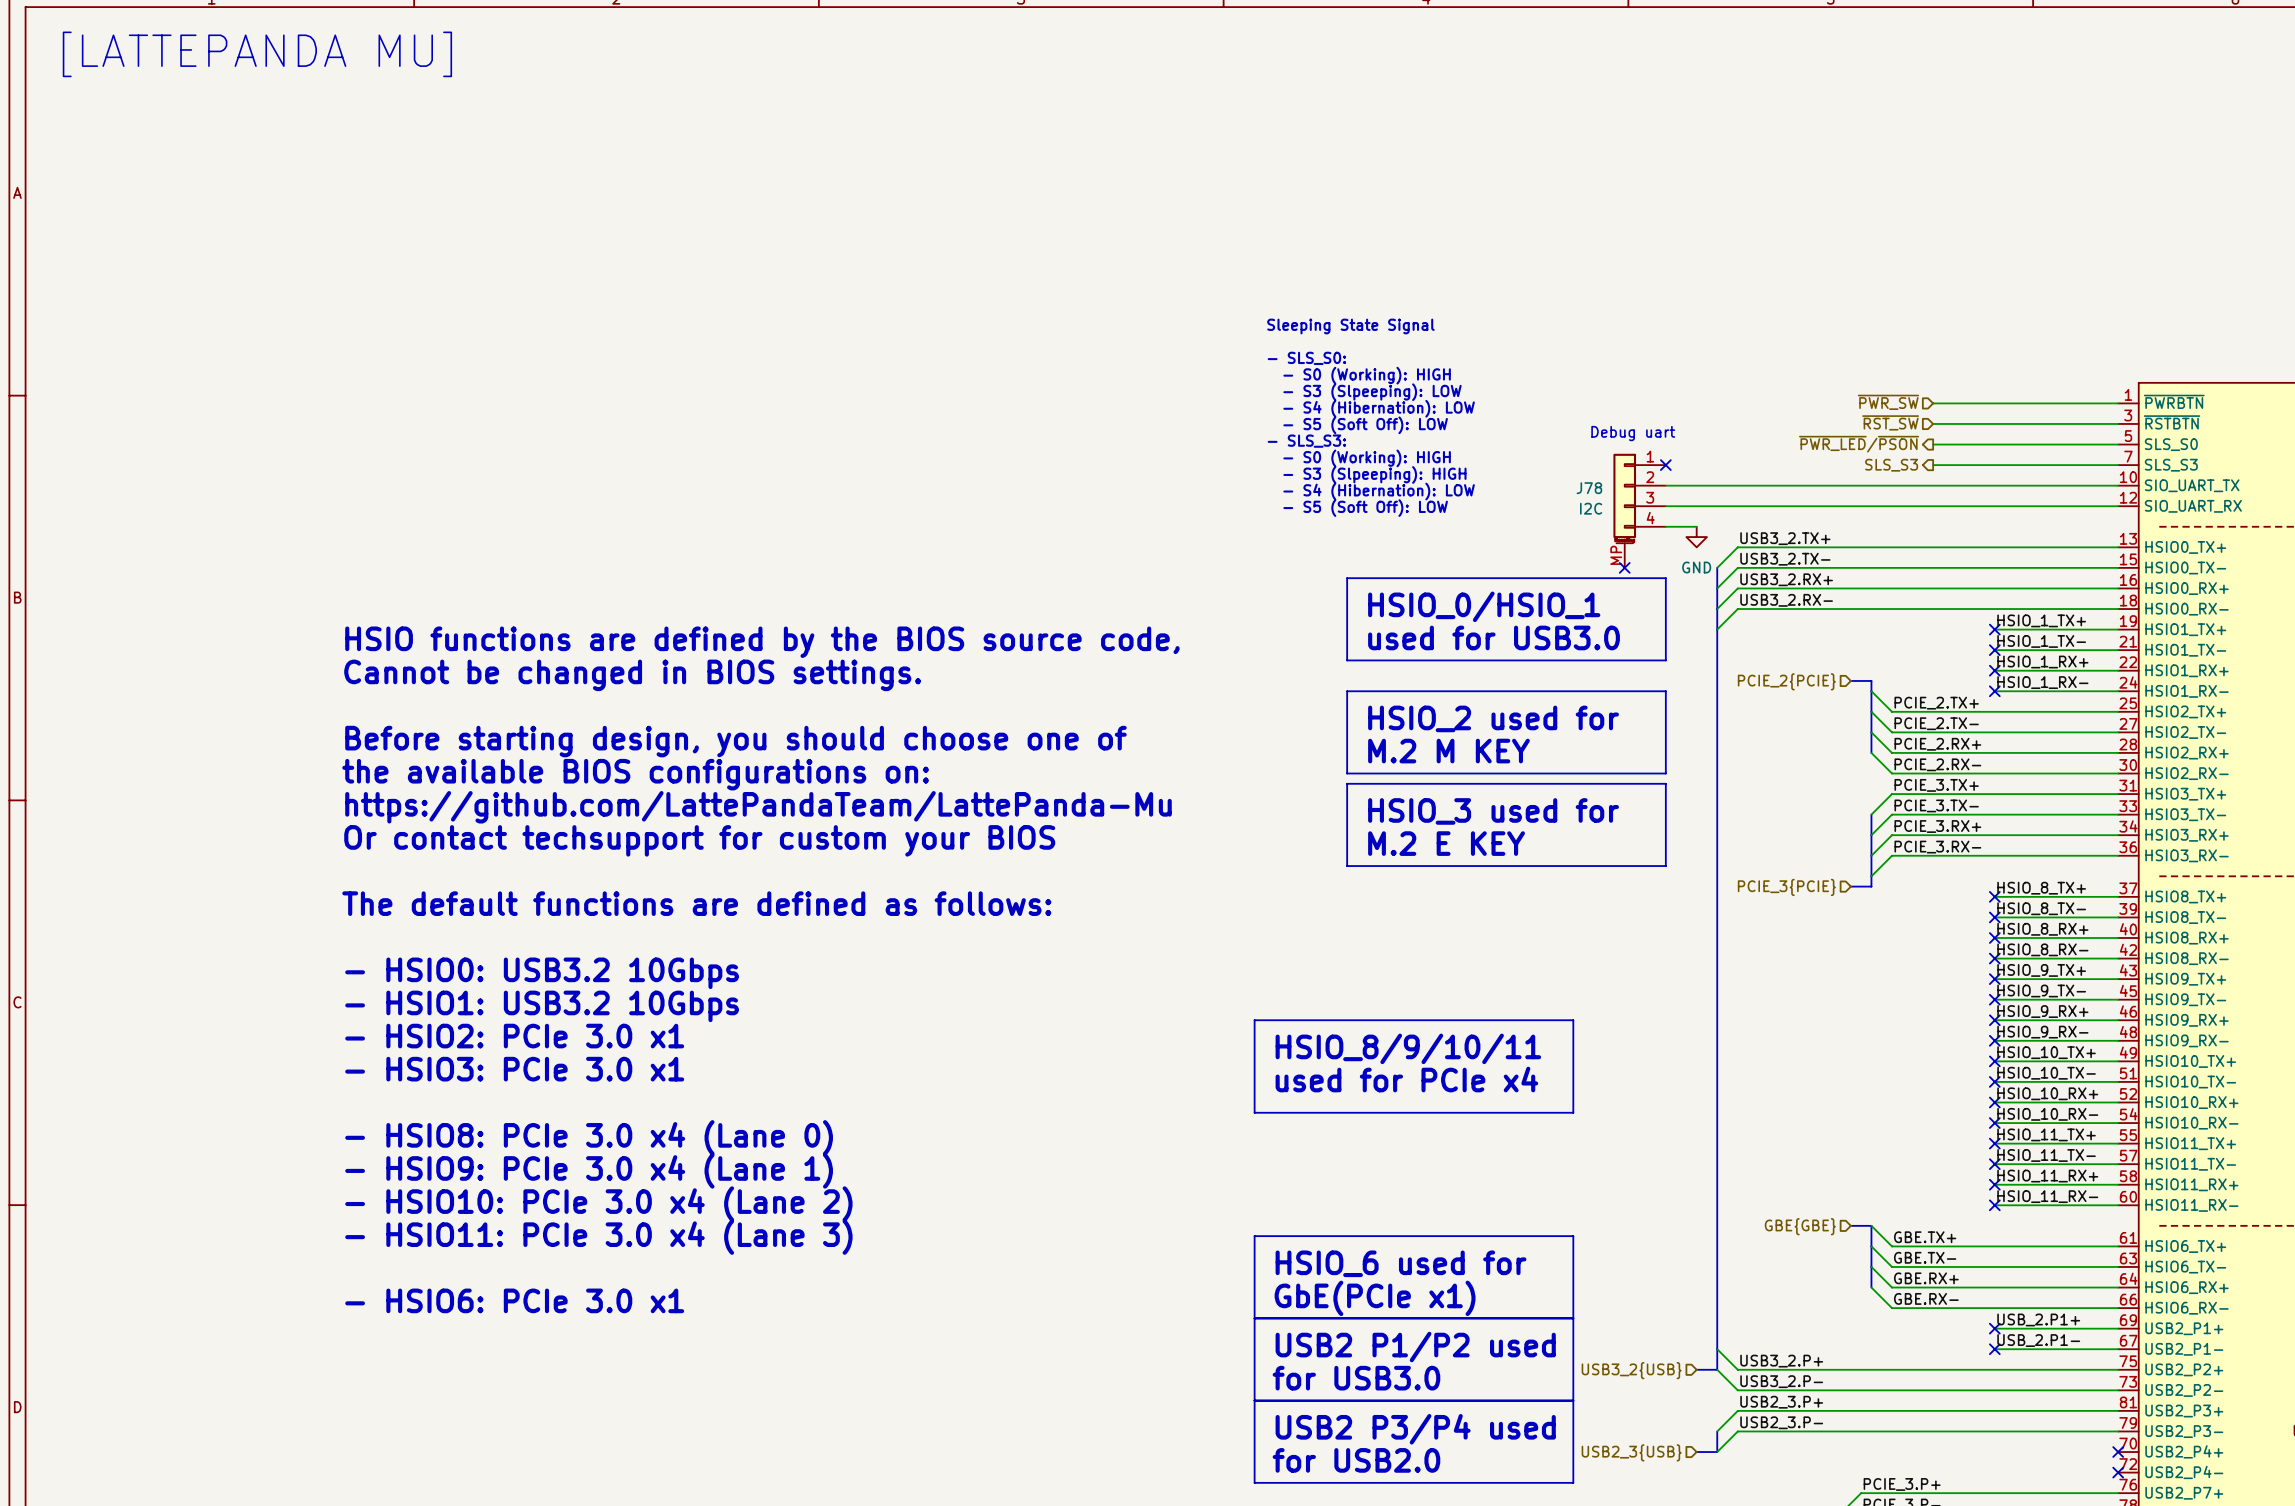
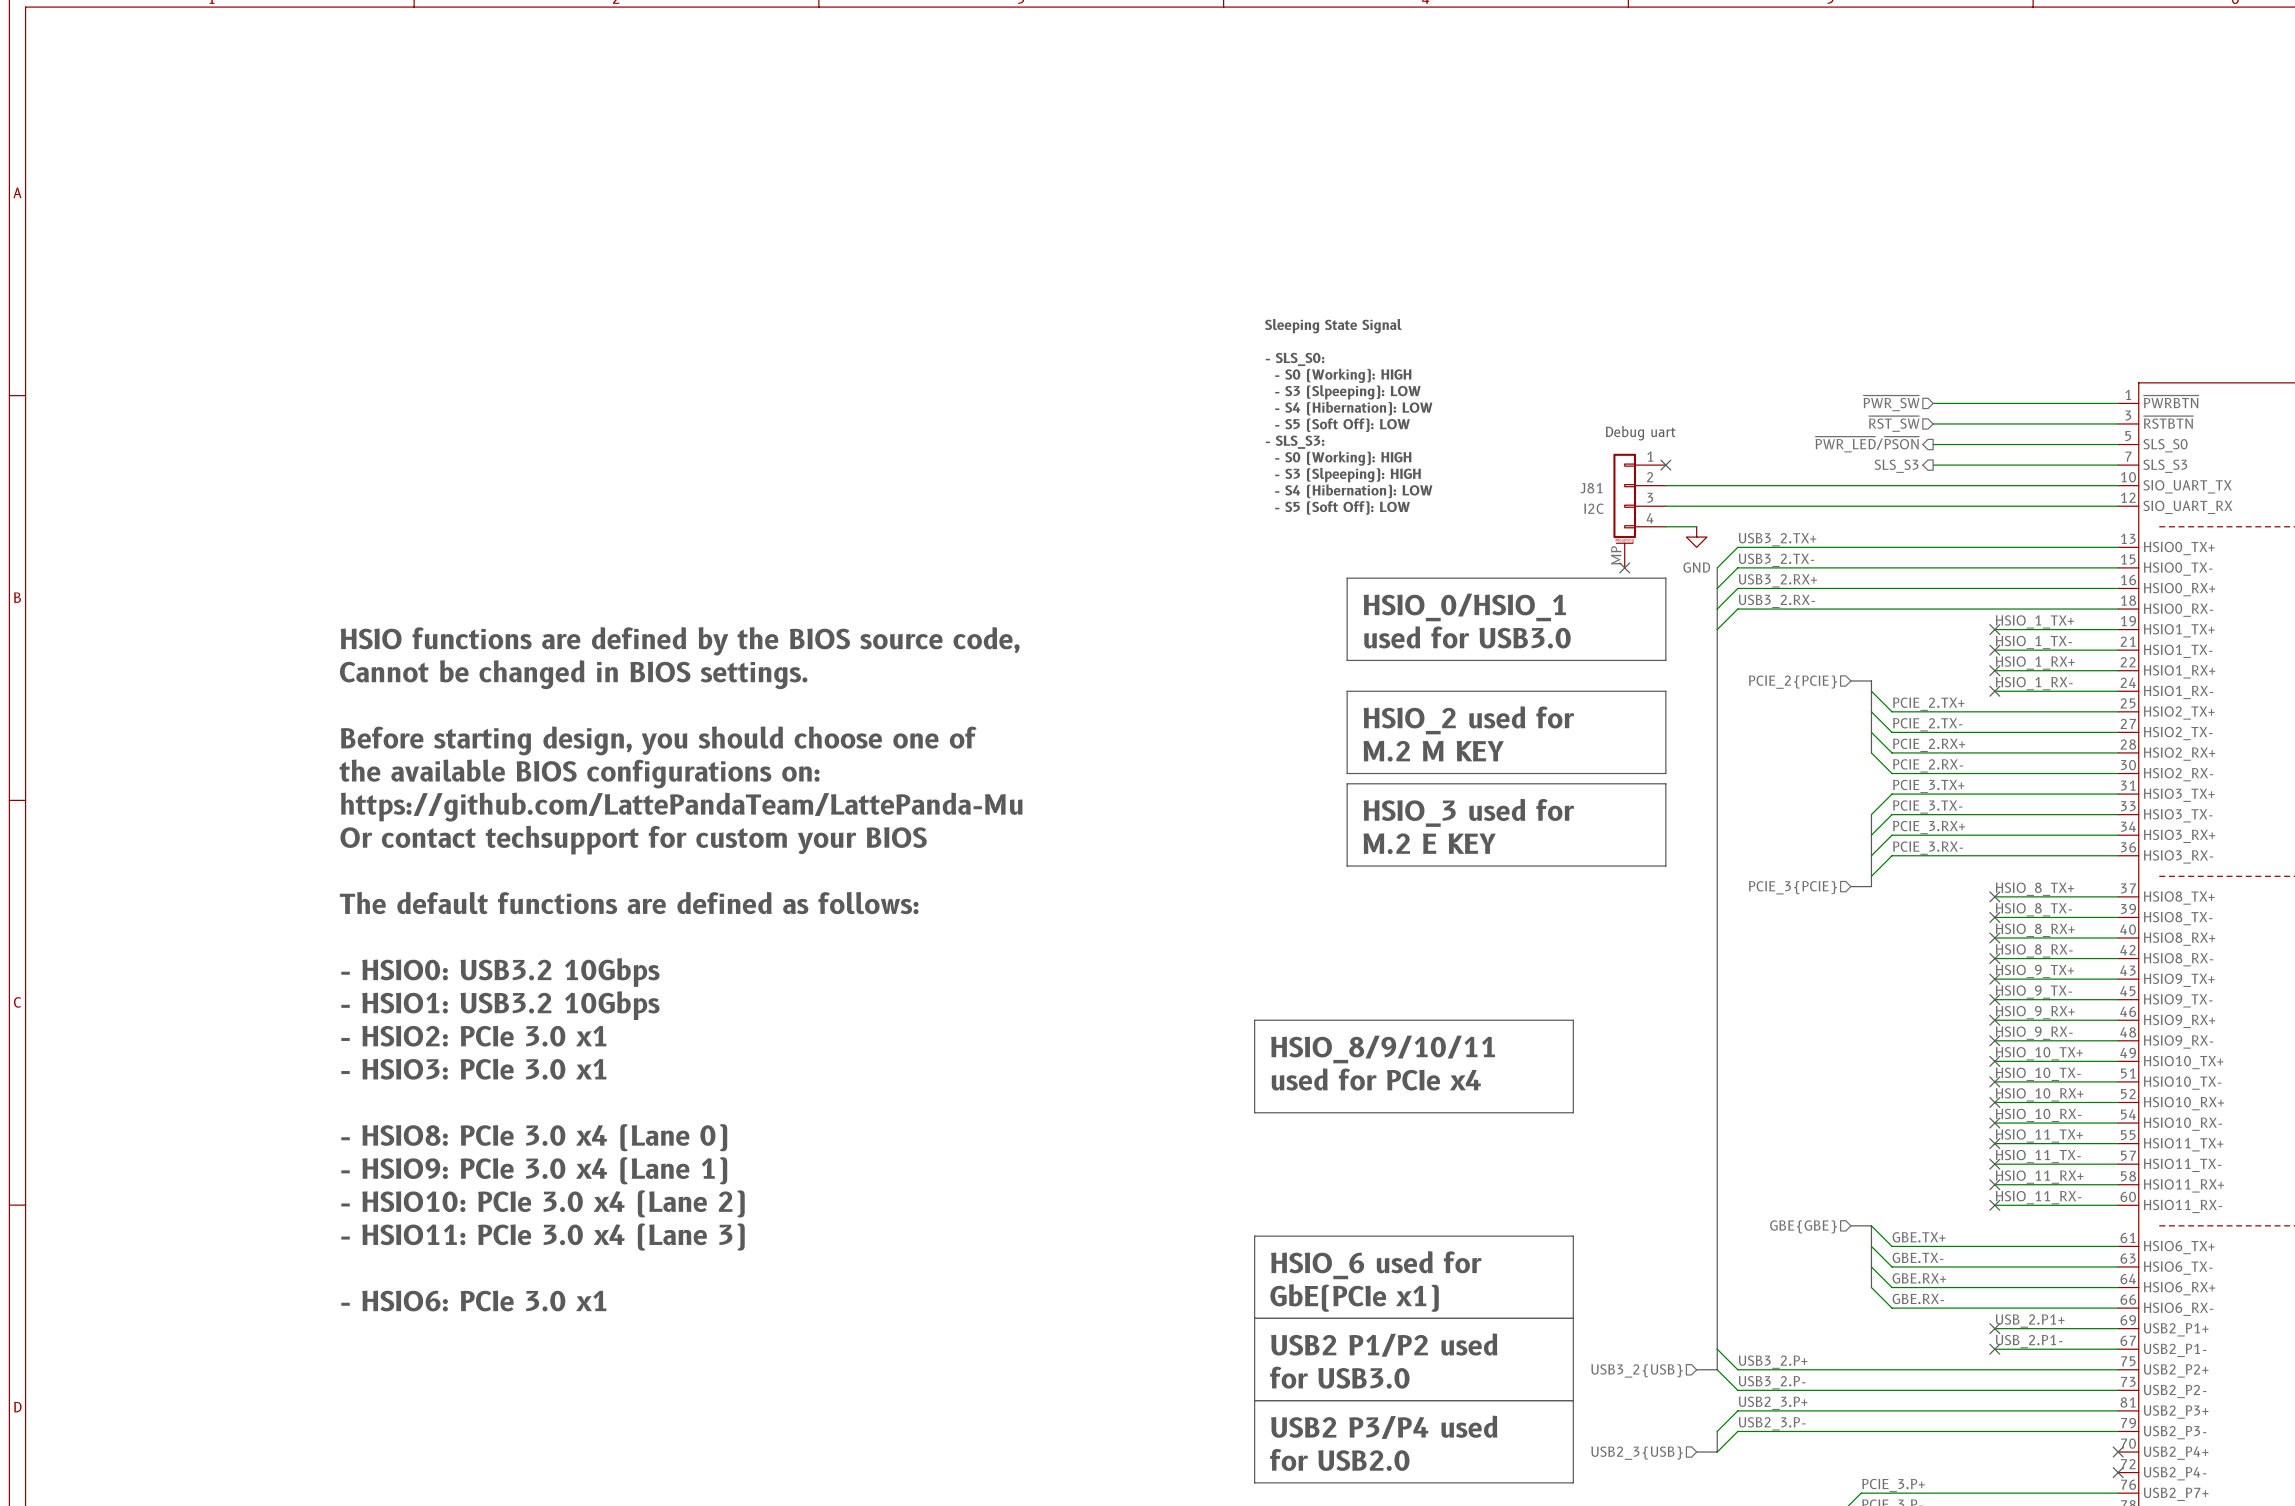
text: [LATTEPANDA MU] (257, 54) -> none
J78 name: J78 (1589, 488) -> J81 (1591, 488)

